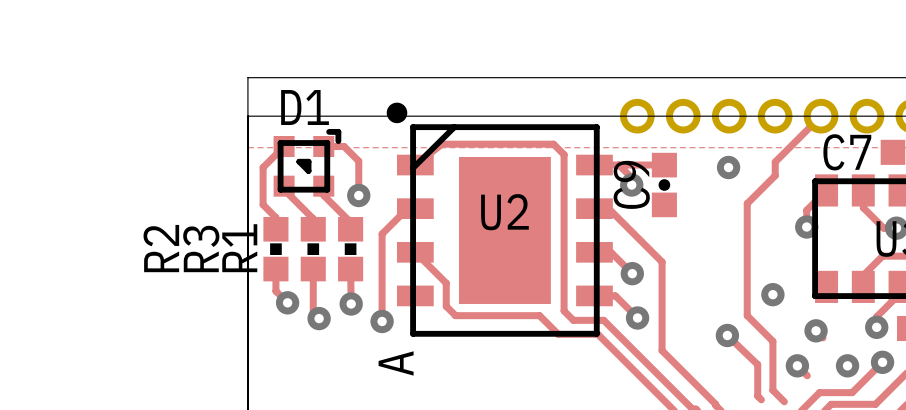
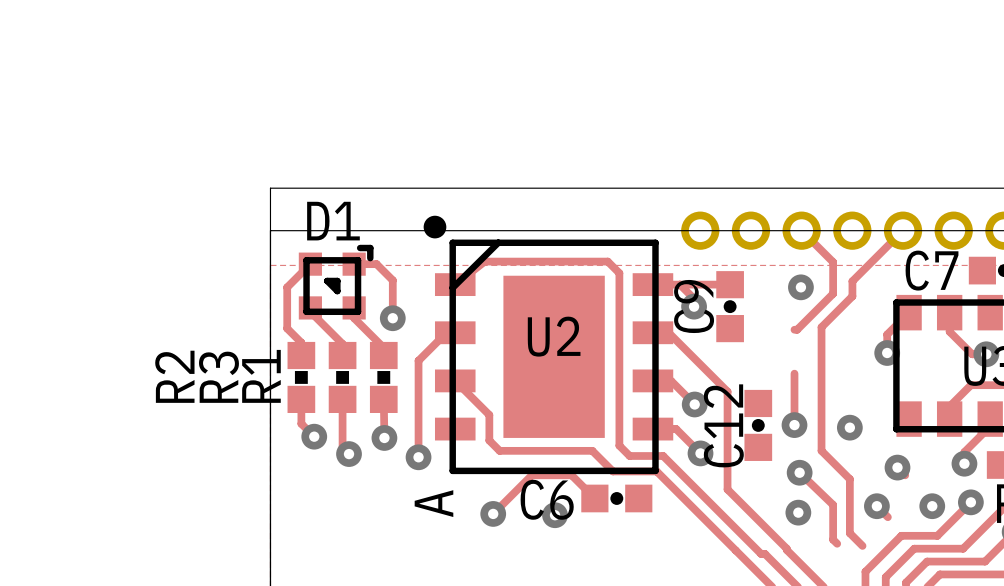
track: none -> (801, 230) (833, 262) (833, 293) (797, 329) (794, 329)
track: none -> (794, 373) (794, 425)
C12: none -> (758, 425)
via: none -> (794, 425)
track: none -> (594, 498) (571, 475) (531, 475) (493, 513)
C6: none -> (616, 498)
via: none -> (798, 512)
via: none -> (493, 513)
via: none -> (555, 515)

